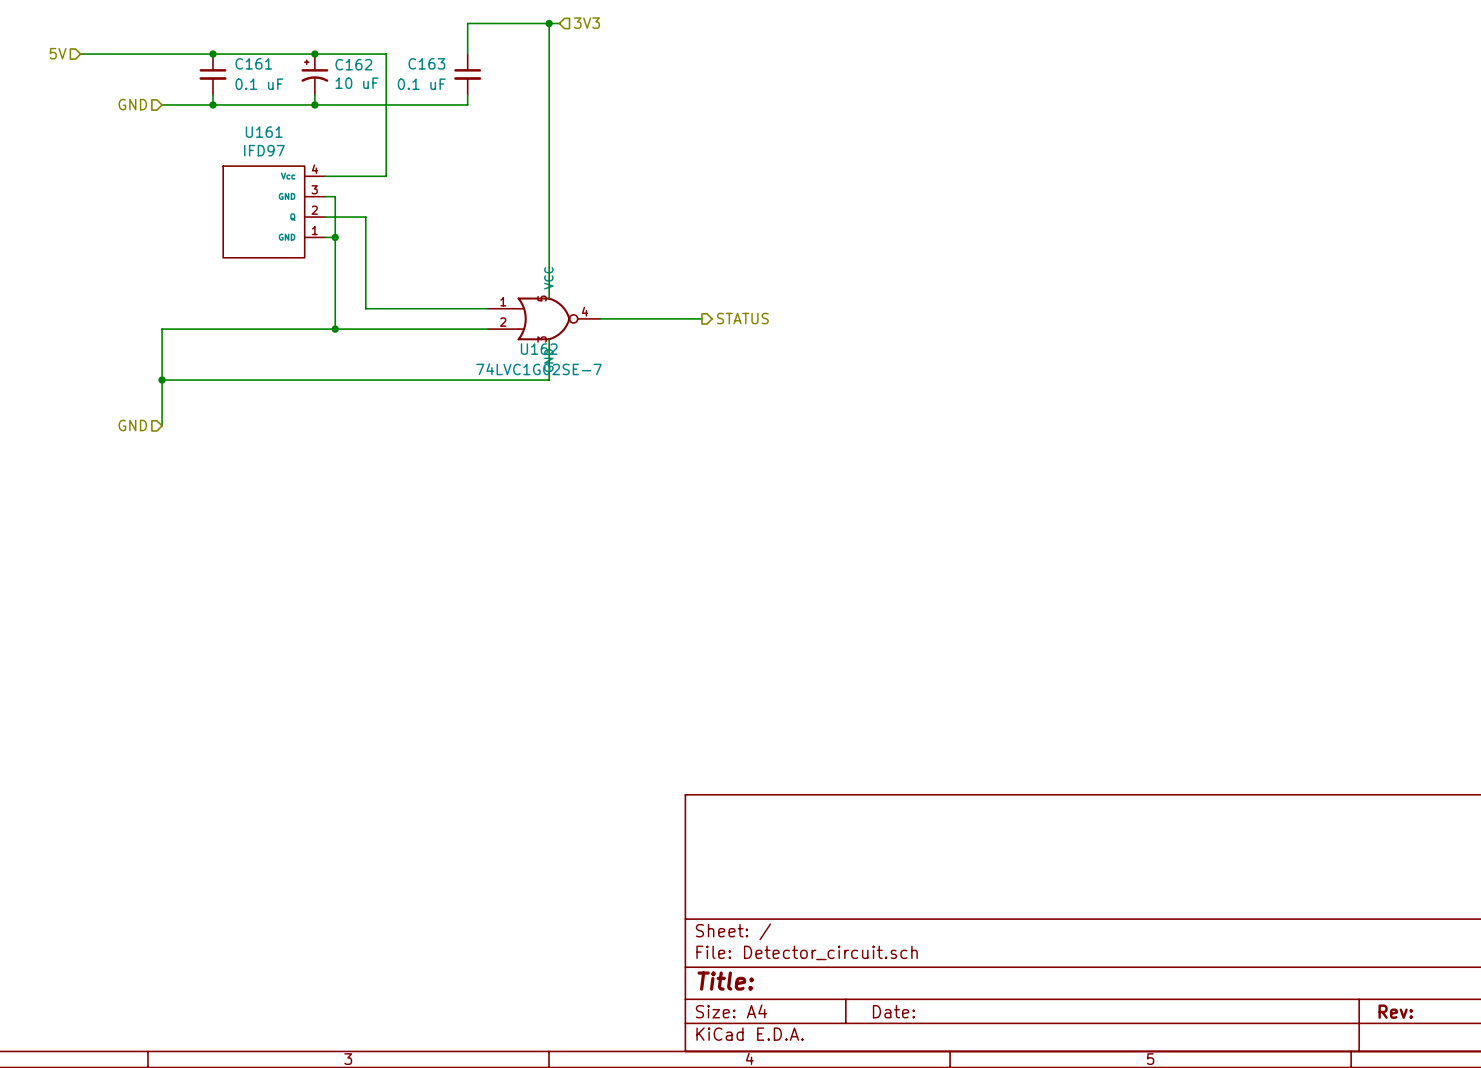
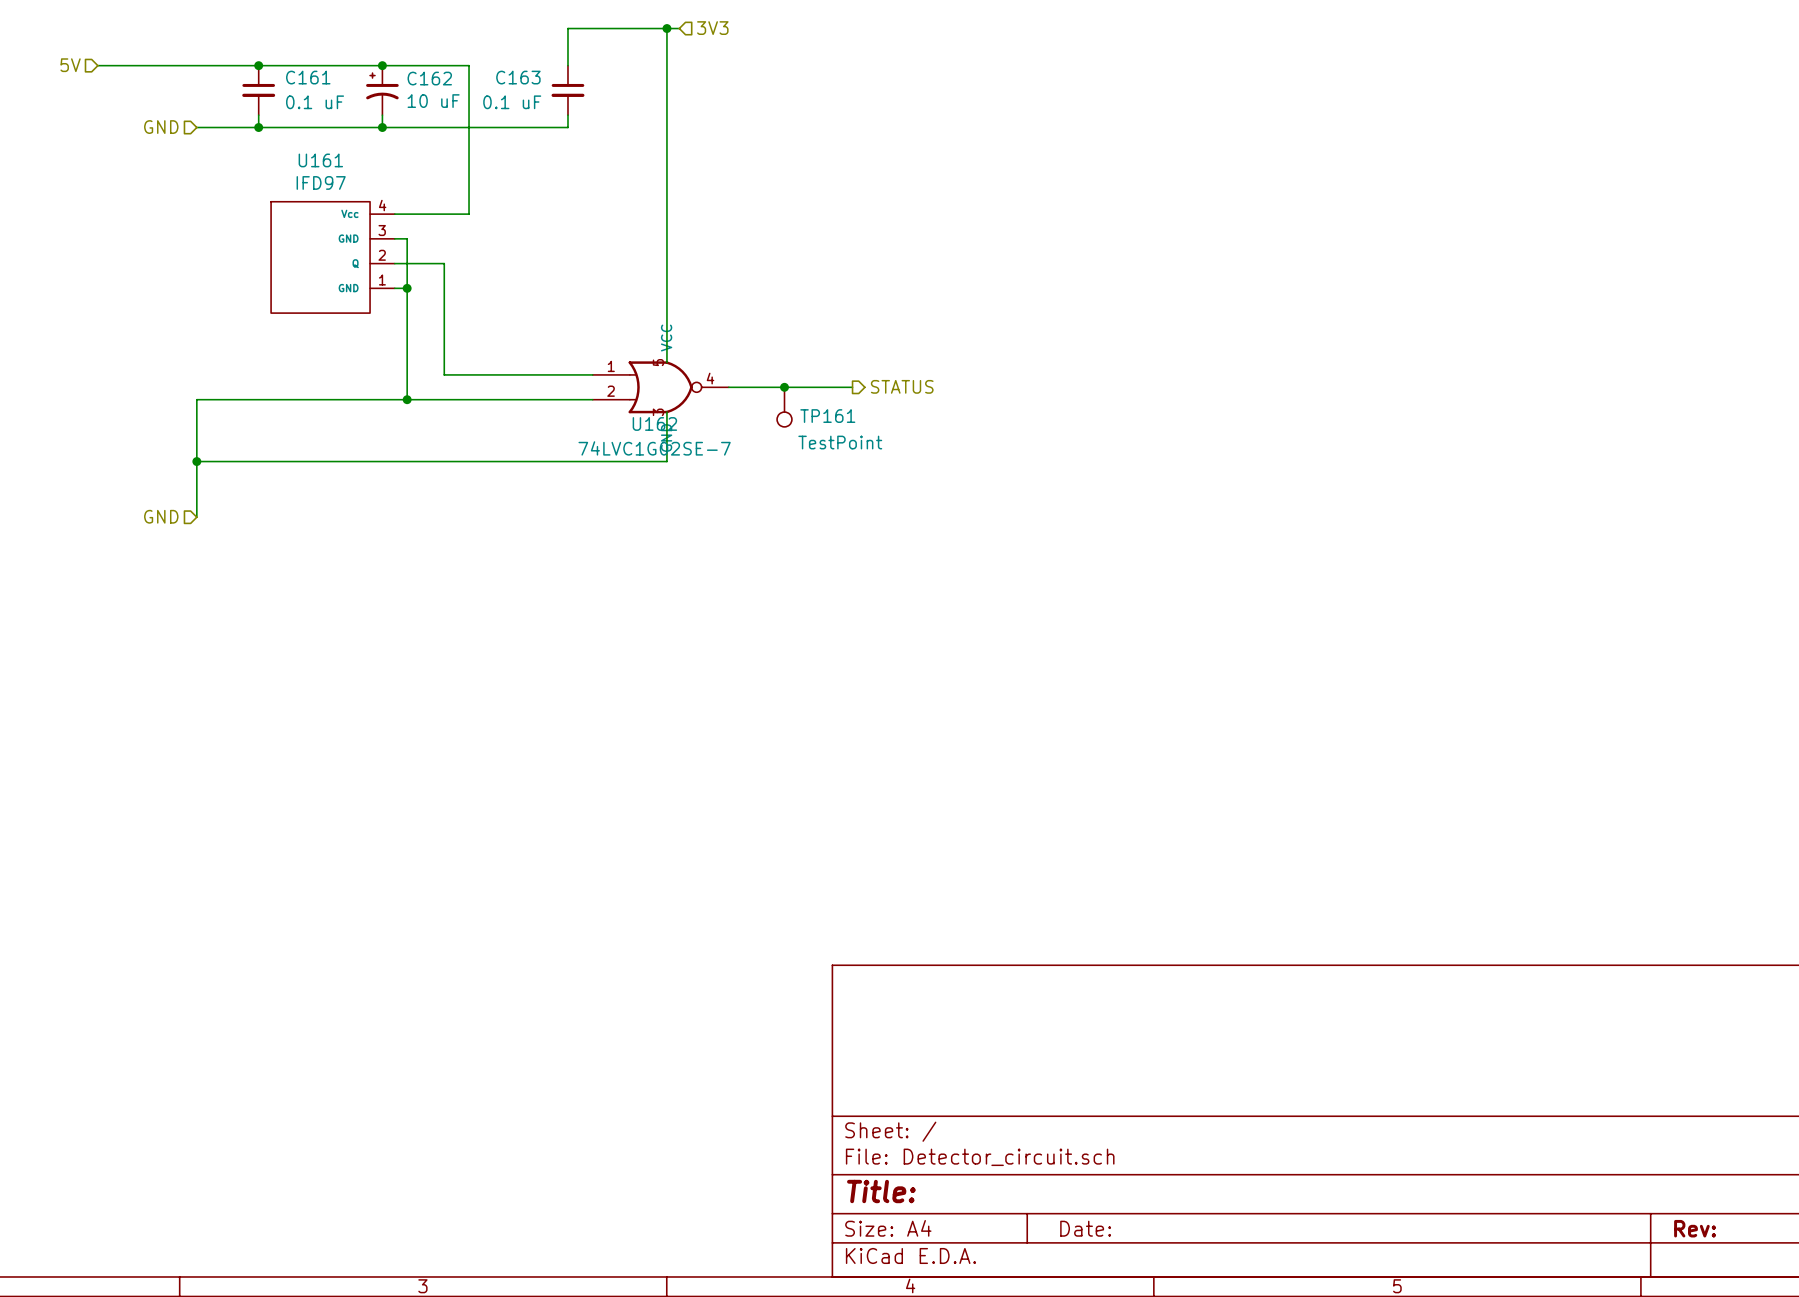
junction: none -> (784, 387)
TP161: none -> TestPoint (784, 407)

